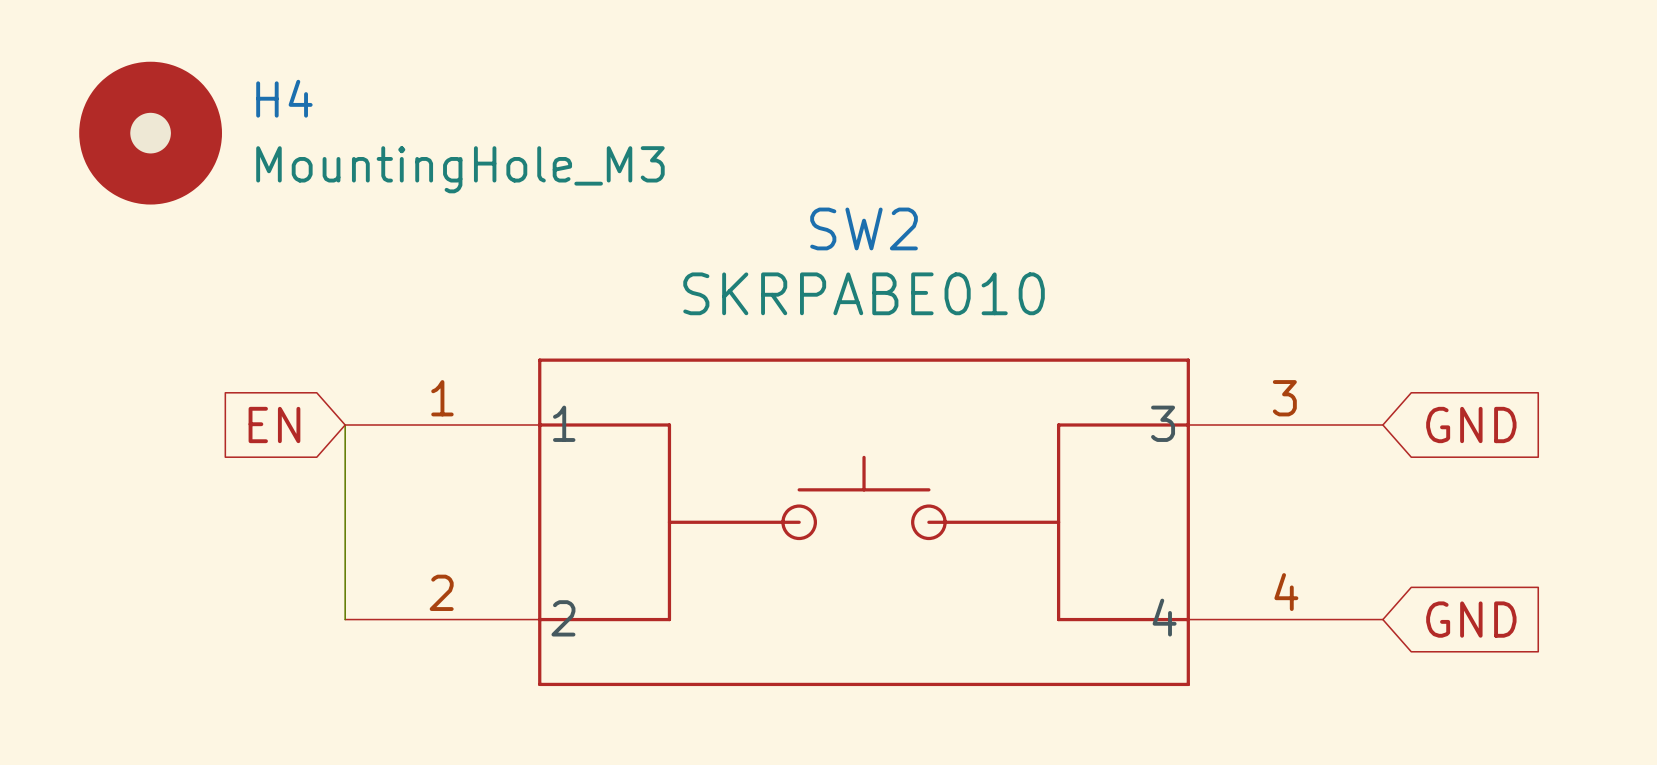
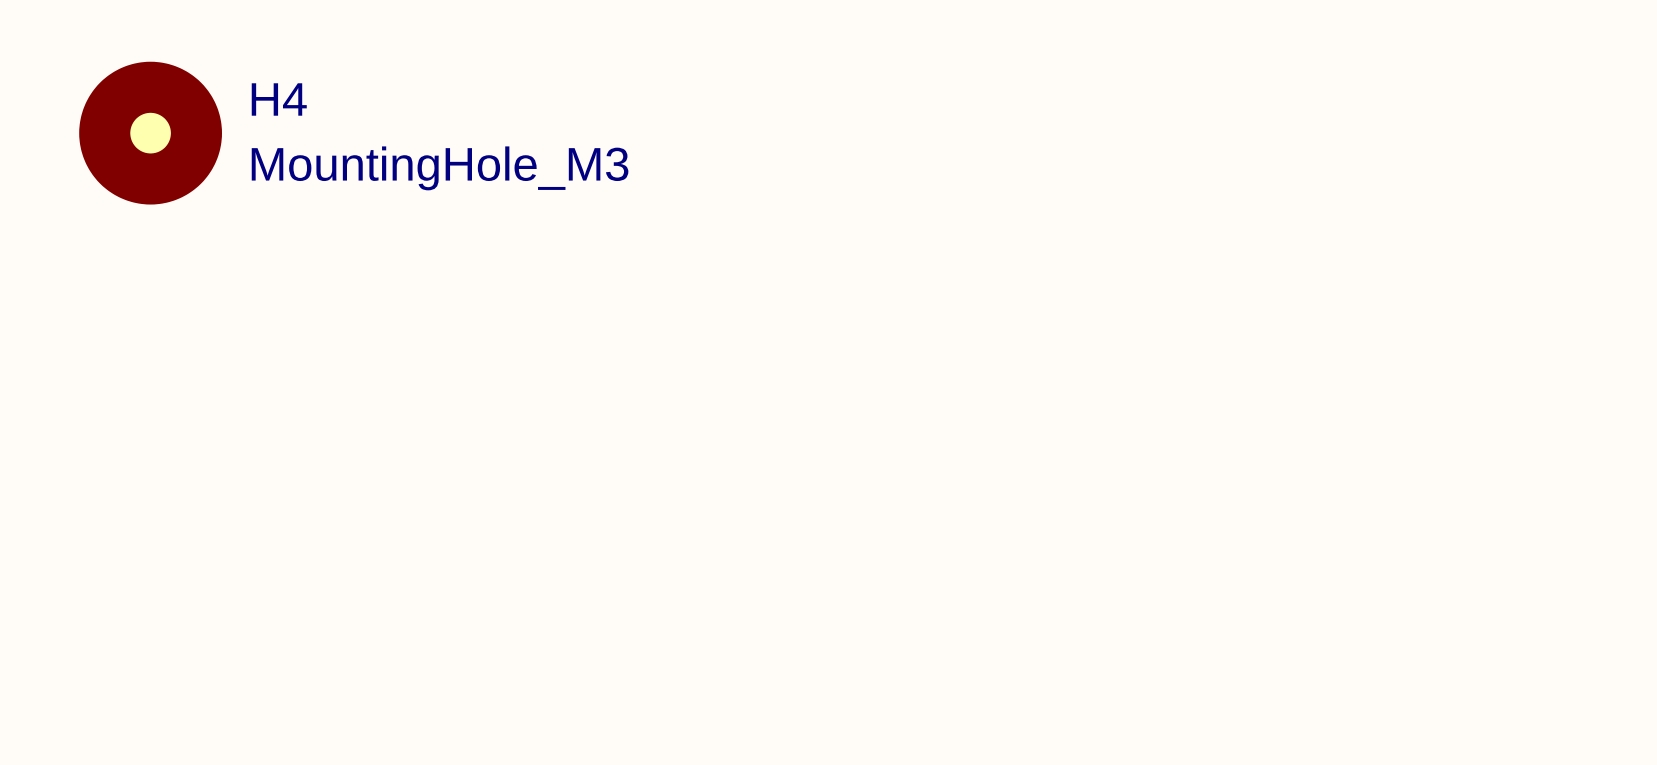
global label: EN (274, 424) -> none
wire: (345, 424) (345, 619) -> none
global label: GND (1471, 424) -> none
SW2: SKRPABE010 (864, 522) -> none
global label: GND (1471, 619) -> none

